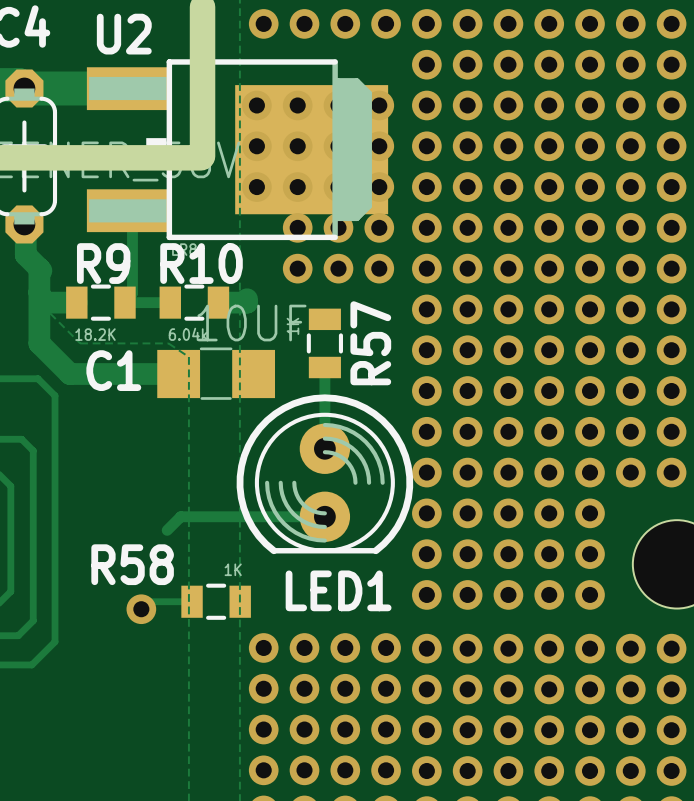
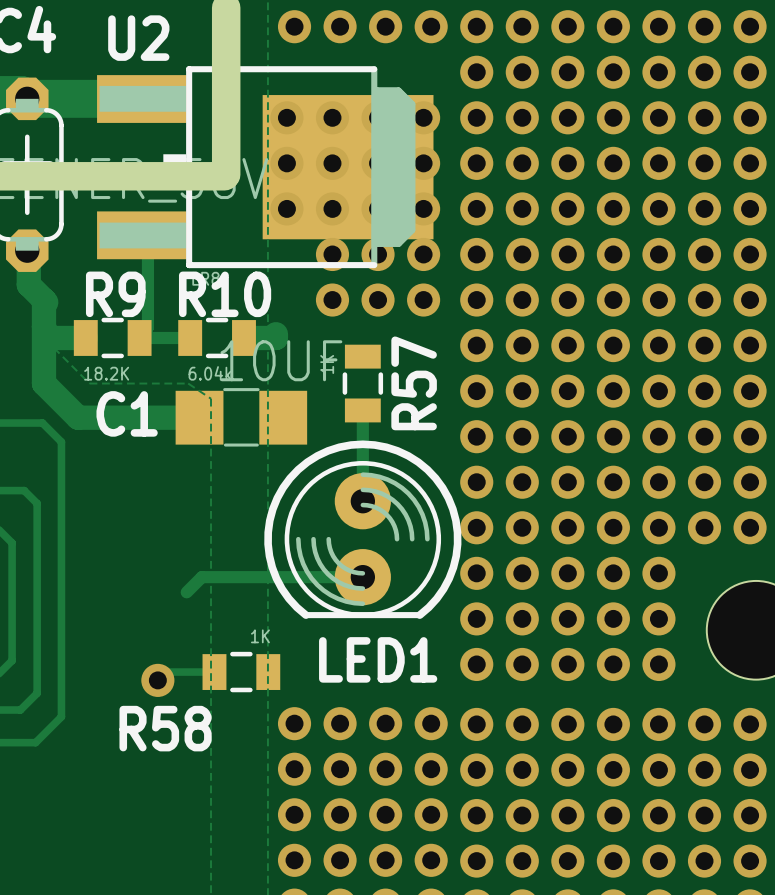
R58 name position: R58 (132, 564) -> R58 (165, 728)

